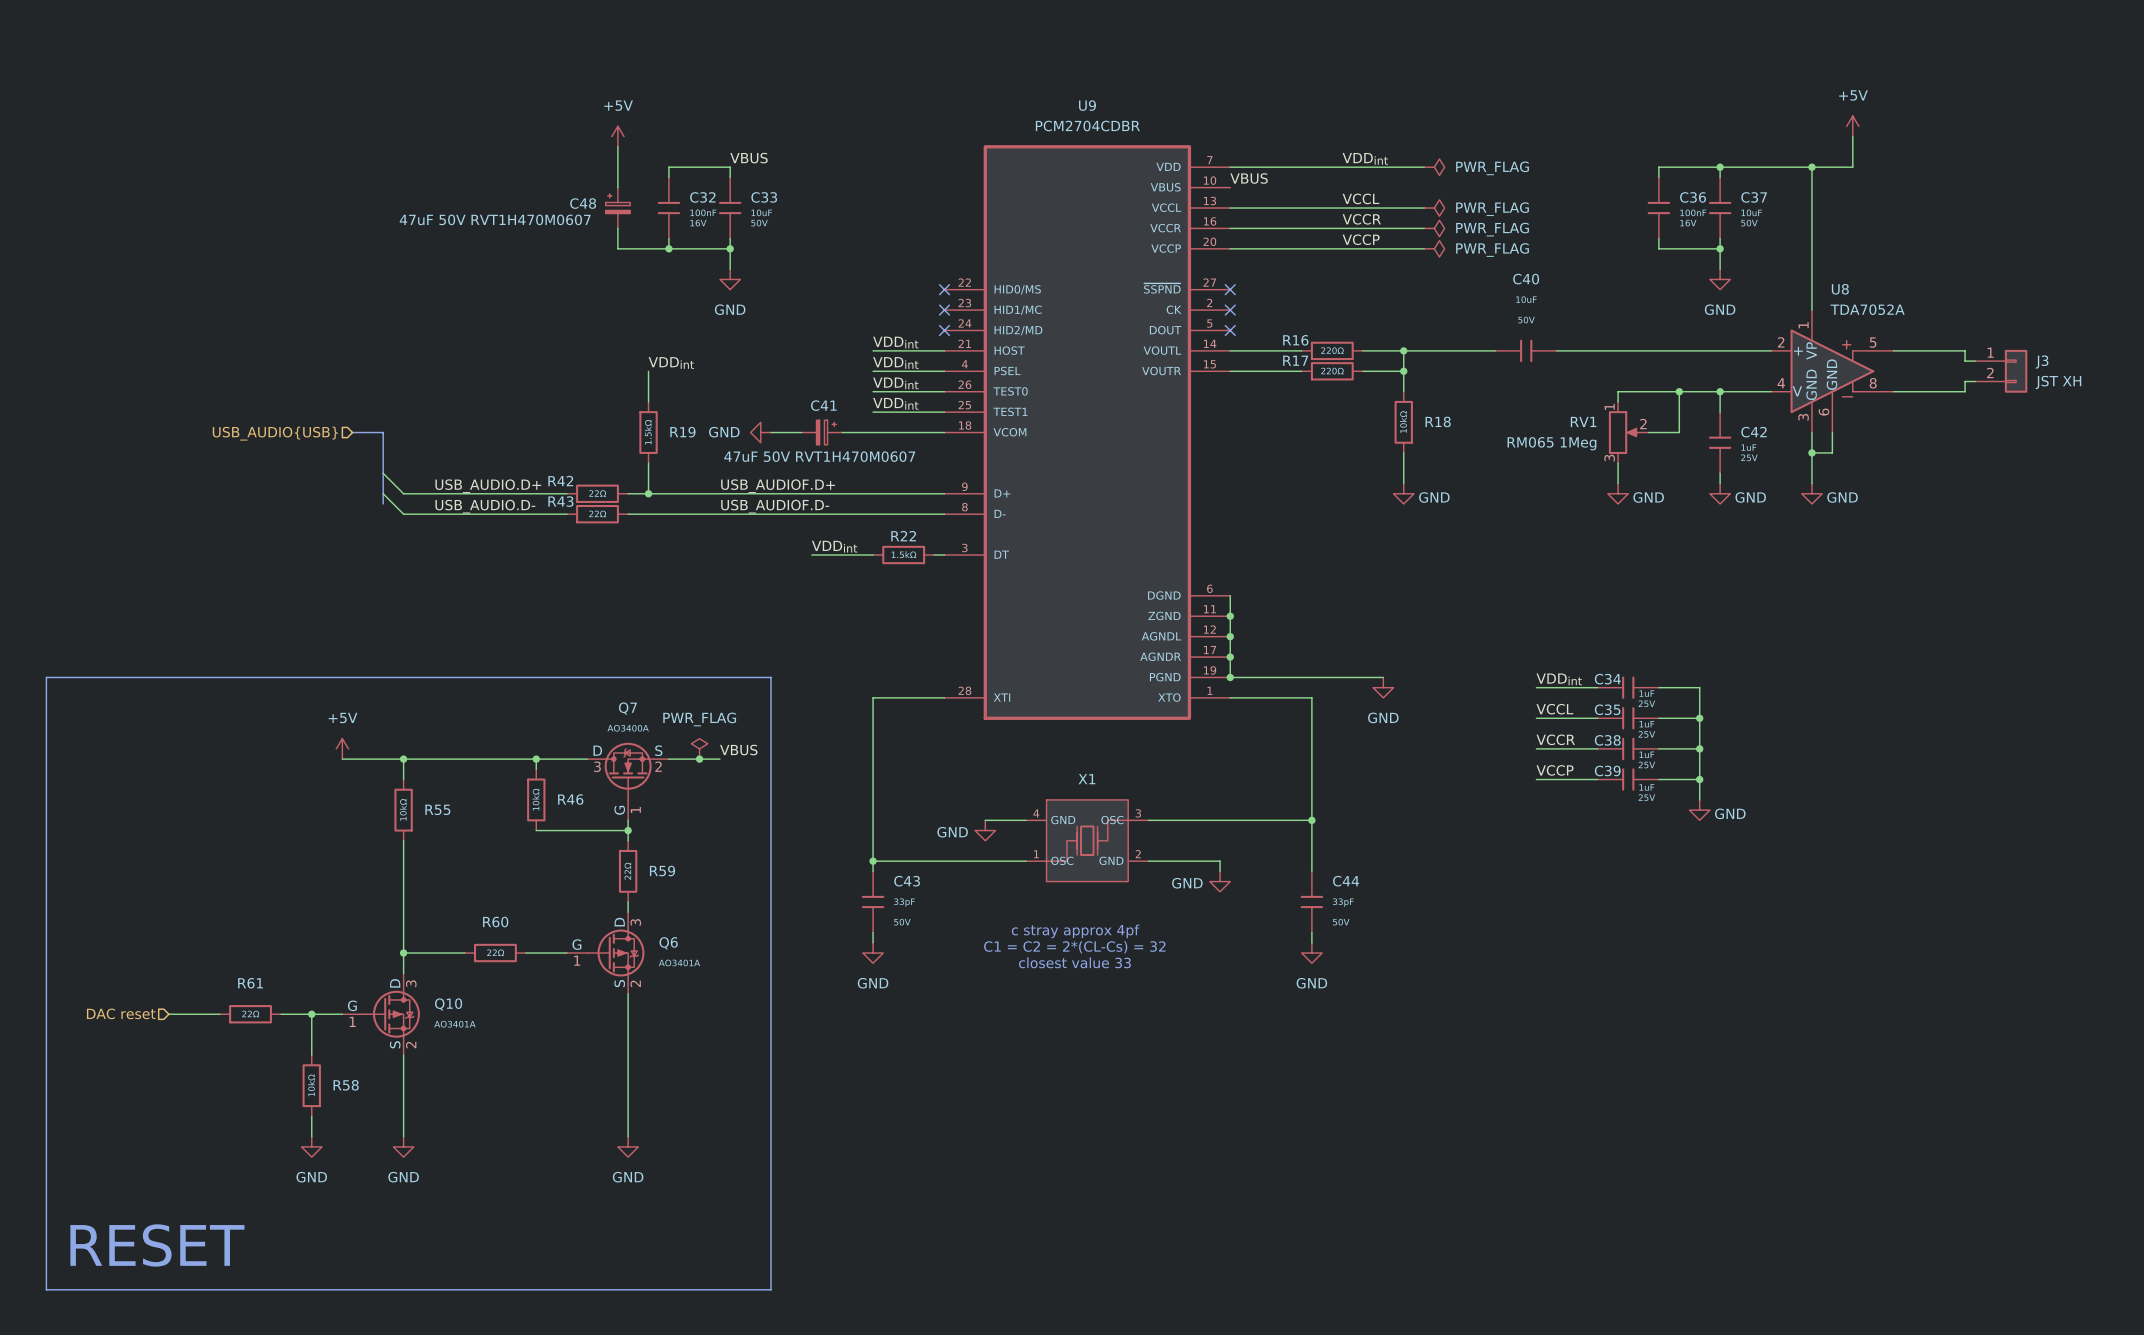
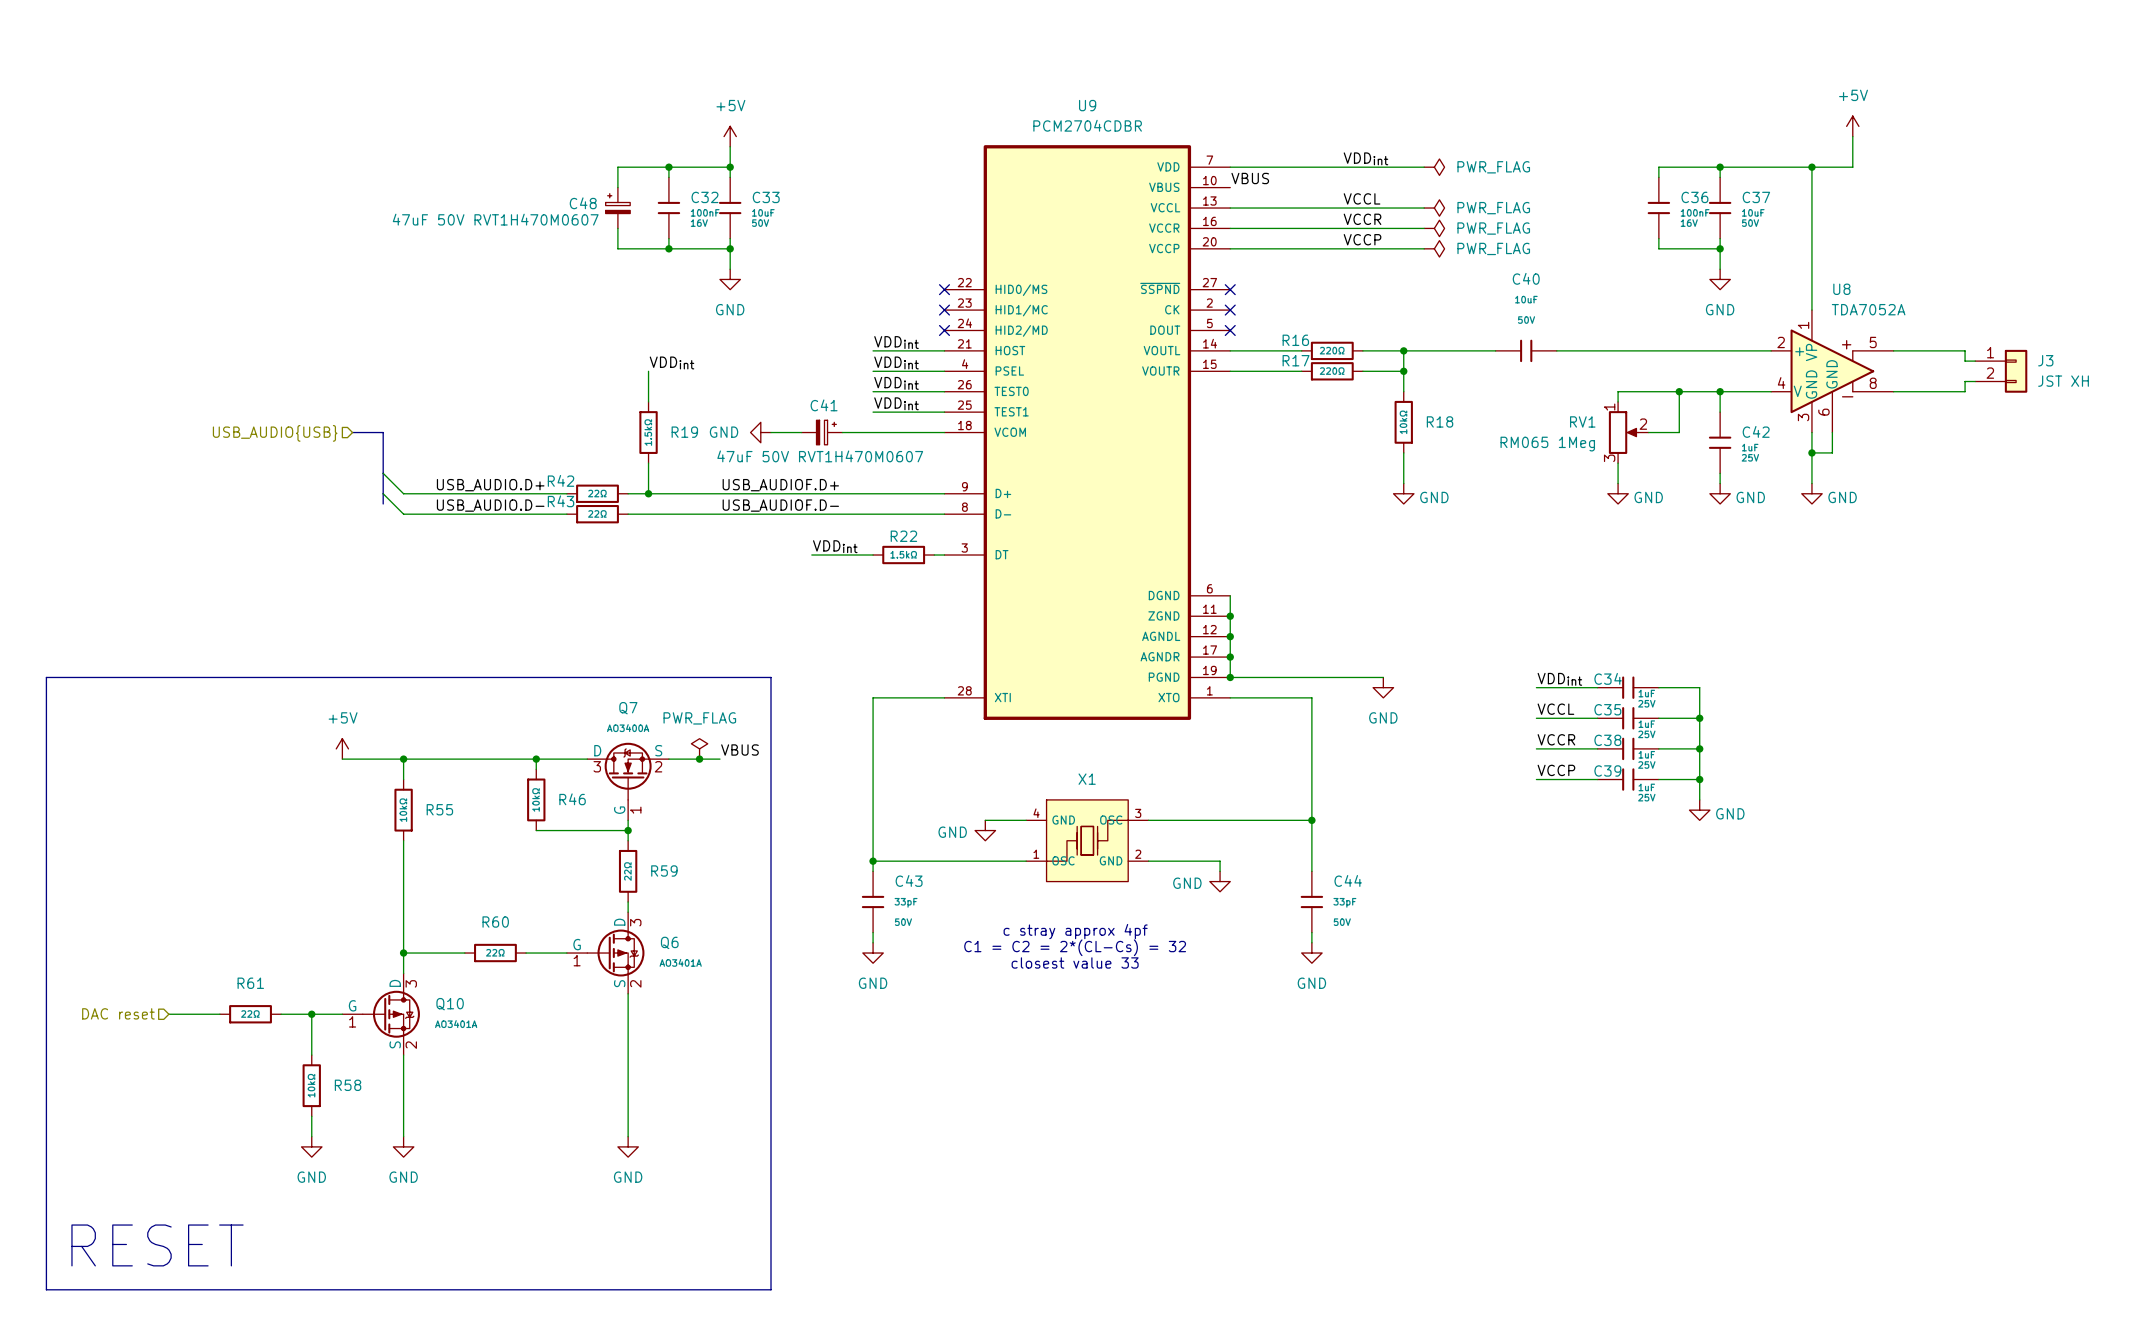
power symbol position: +5V (617, 136) -> +5V (730, 136)
wire: (617, 146) (617, 167) -> (668, 167) (617, 167)
wire: none -> (730, 146) (730, 167)
label: VBUS (749, 158) -> none
junction: none -> (668, 167)
junction: none -> (730, 167)

